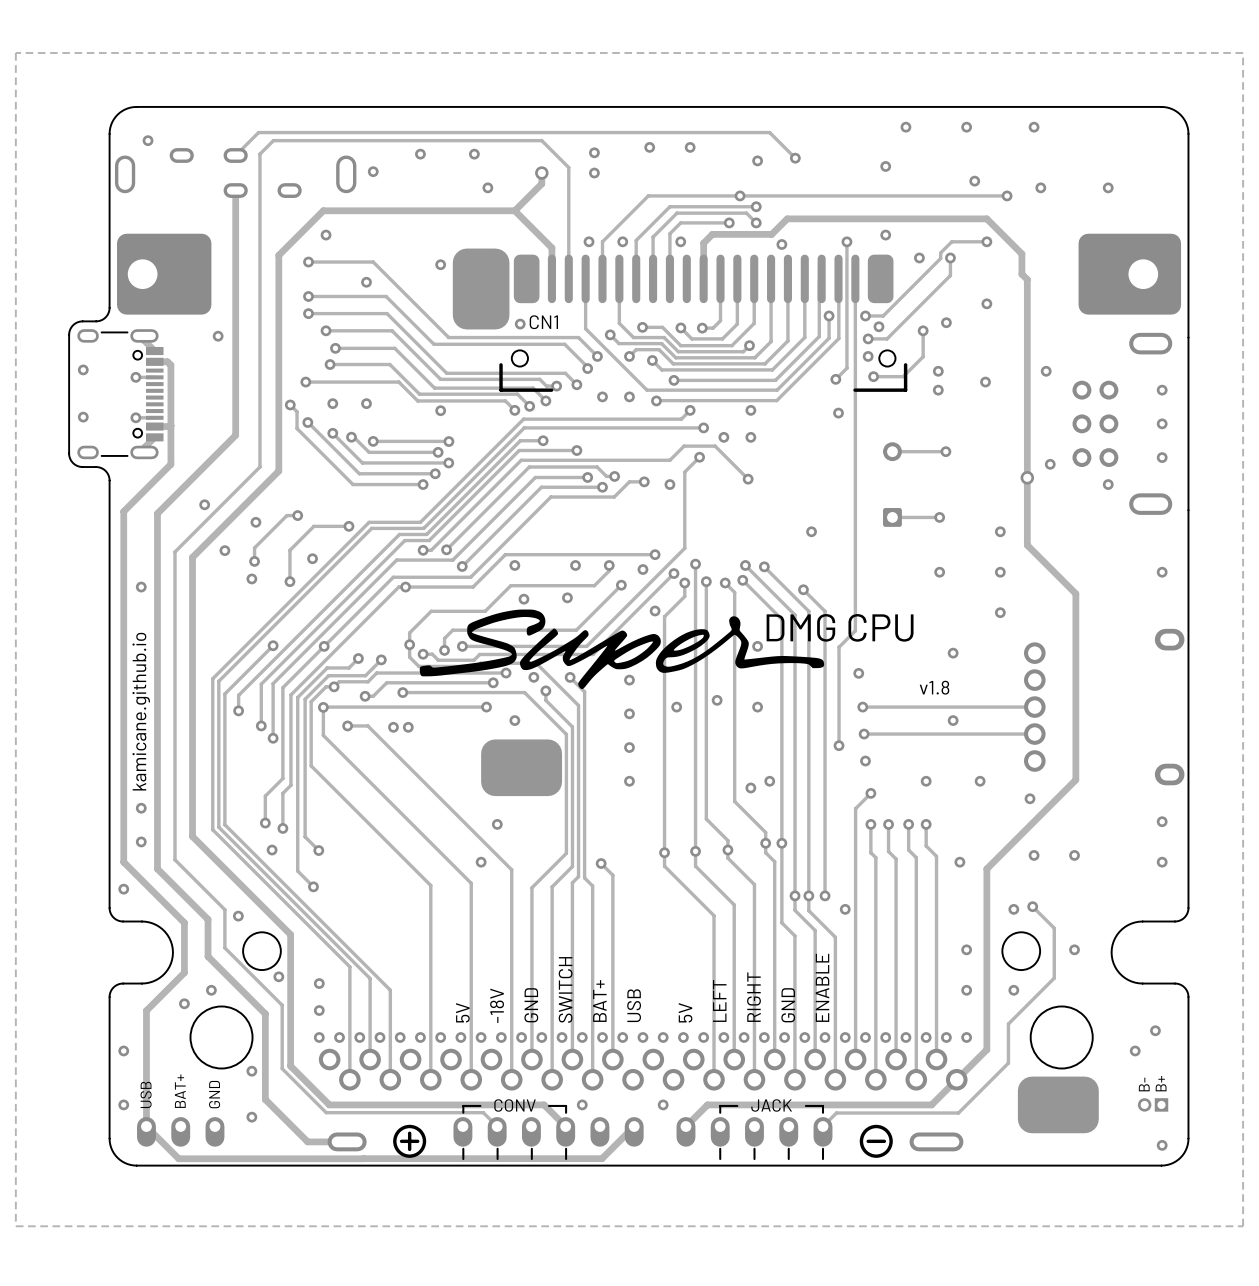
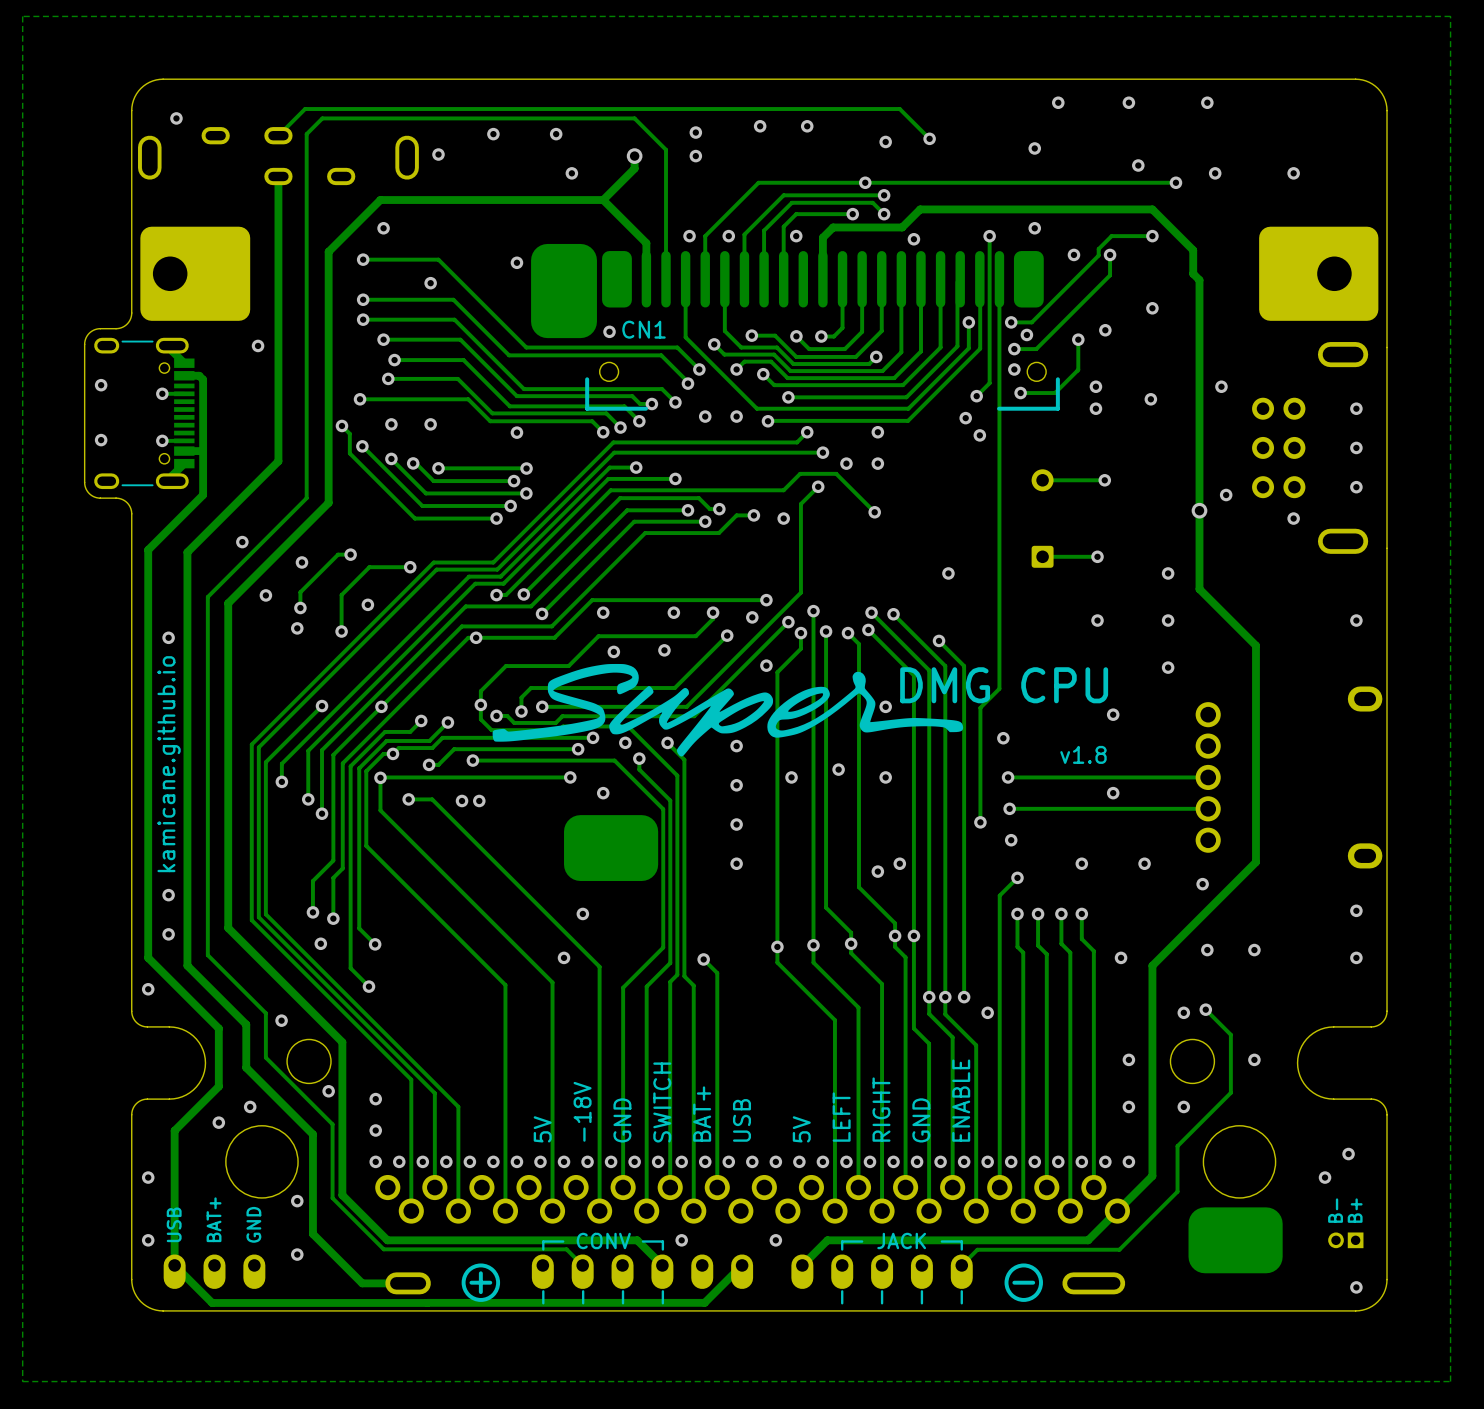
via: none -> (965, 418)

